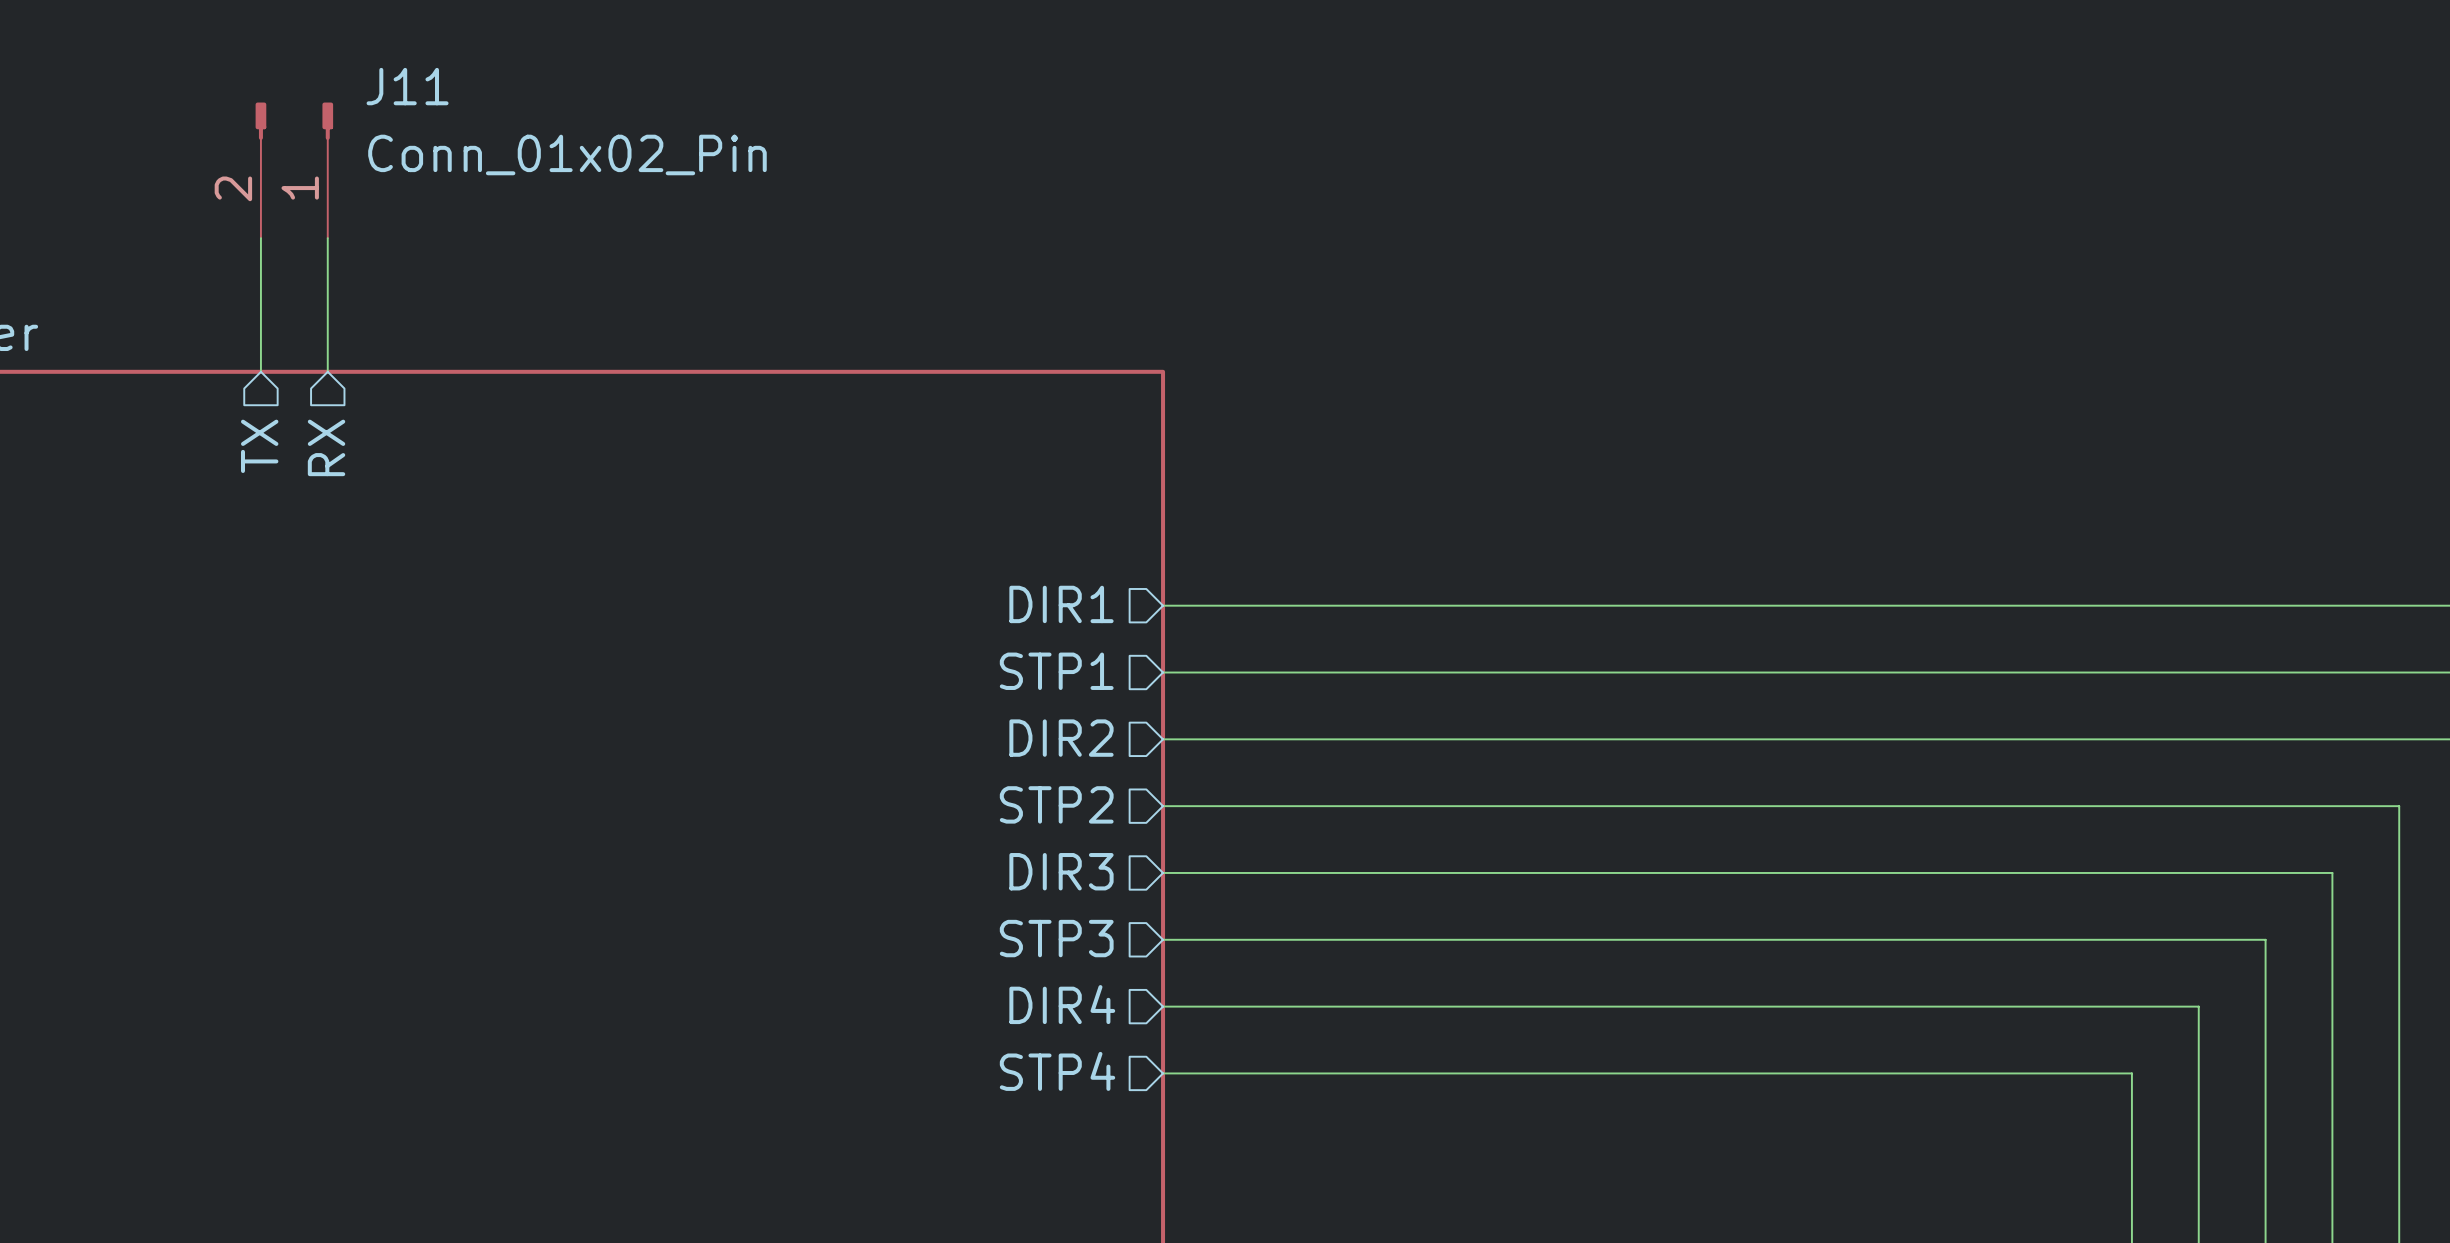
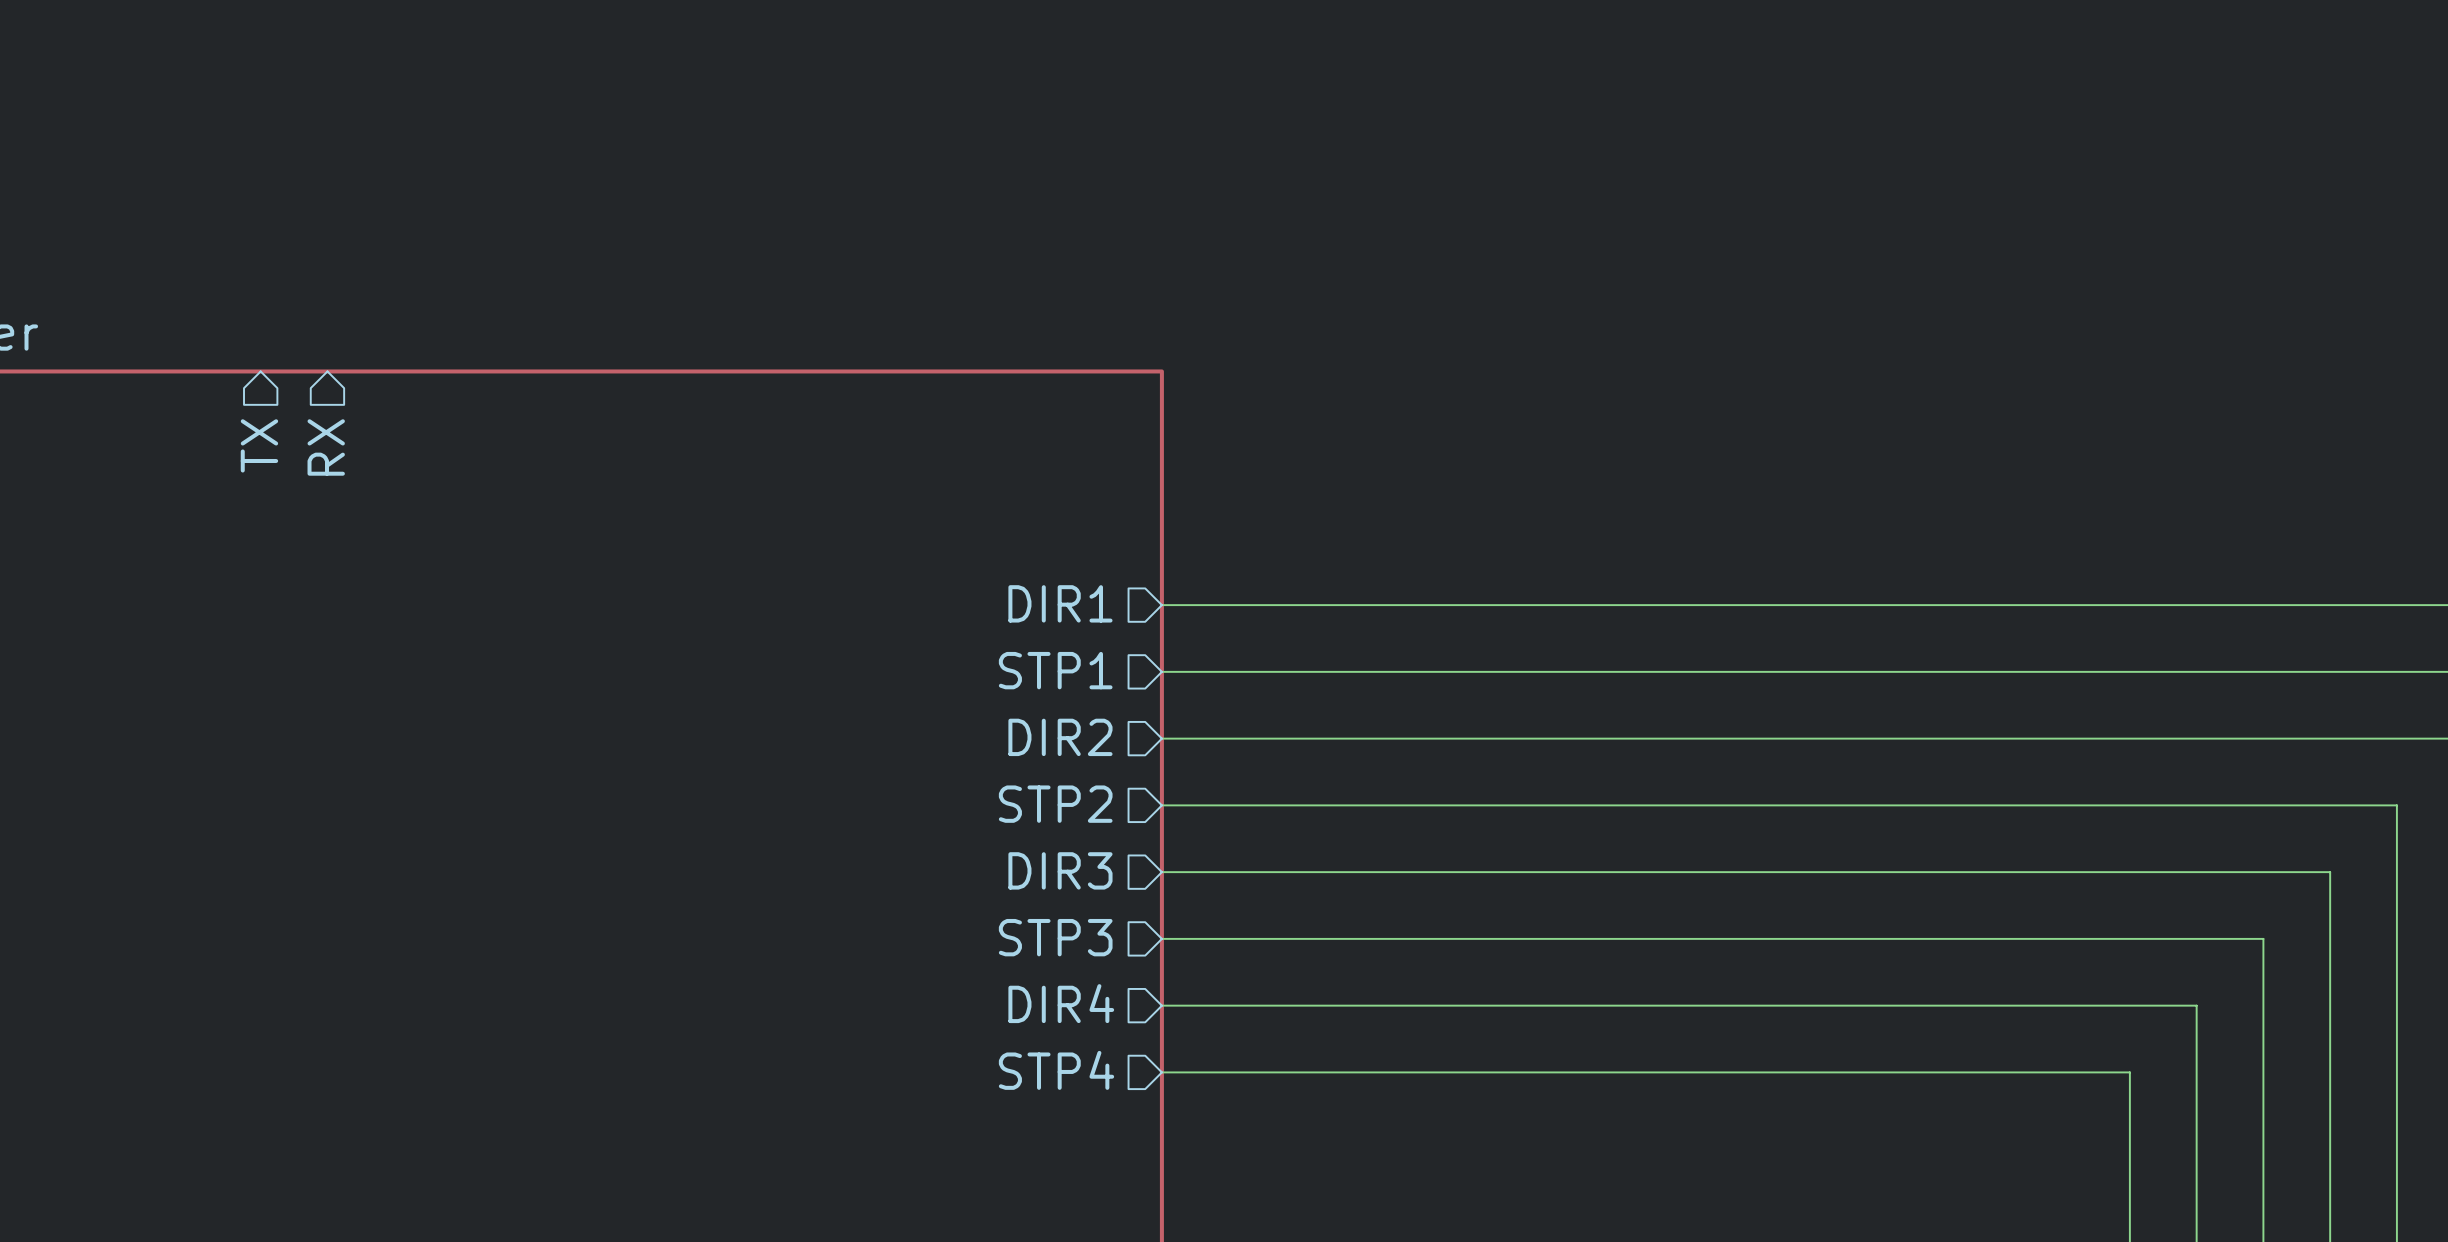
J11: Conn_01x02_Pin (294, 170) -> none
wire: (260, 238) (260, 371) -> none
wire: (327, 238) (327, 371) -> none

